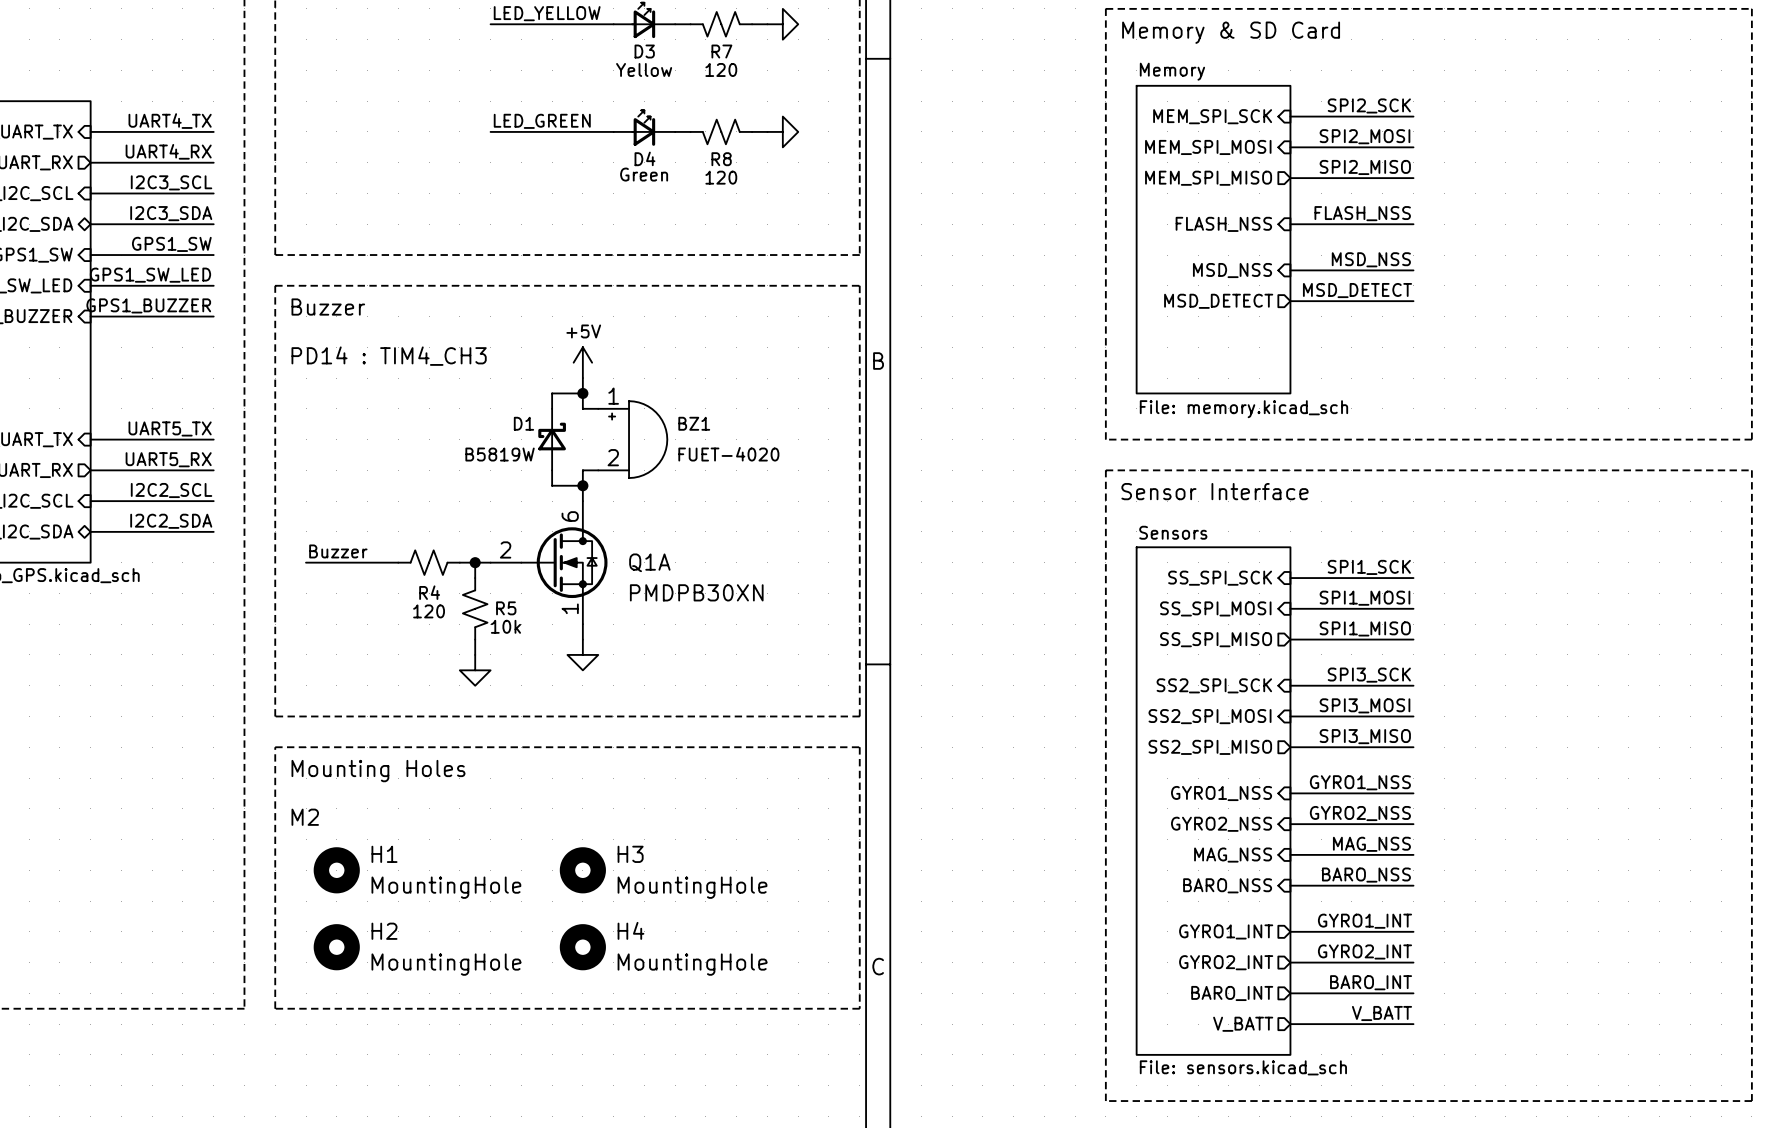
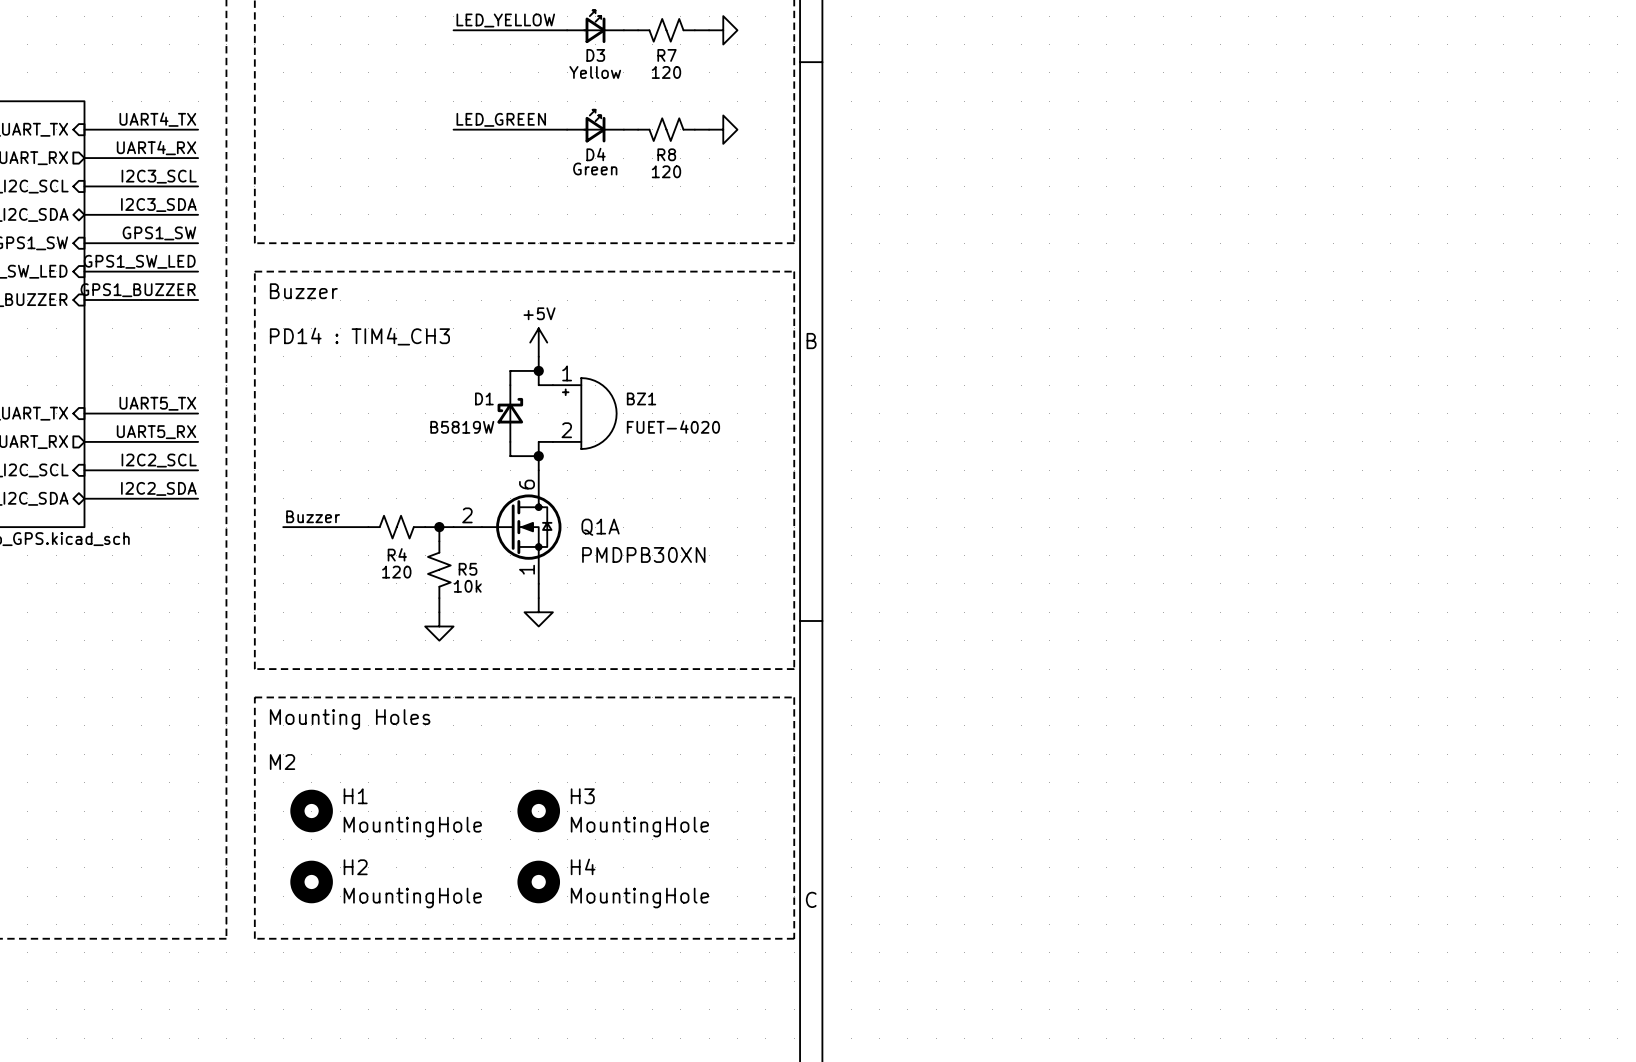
line: (1105, 8) (1105, 439) (1751, 439) (1751, 8) (1105, 8) -> none
text: Memory & SD Card (1231, 32) -> none
label: SPI2_SCK (1369, 105) -> none
sheet pin: MEM_SPI_SCK (1212, 116) -> none
wire: (1290, 116) (1413, 116) -> none
label: SPI2_MOSI (1365, 136) -> none
sheet pin: MEM_SPI_MOSI (1208, 147) -> none
wire: (1290, 147) (1413, 147) -> none
label: SPI2_MISO (1365, 167) -> none
sheet pin: MEM_SPI_MISO (1208, 178) -> none
wire: (1290, 178) (1413, 178) -> none
label: FLASH_NSS (1362, 213) -> none
sheet pin: FLASH_NSS (1223, 224) -> none
wire: (1290, 224) (1413, 224) -> none
sheet Memory: File: memory.kicad_sch (1213, 239) -> none
label: MSD_NSS (1371, 259) -> none
sheet pin: MSD_NSS (1232, 270) -> none
wire: (1290, 270) (1413, 270) -> none
label: MSD_DETECT (1357, 290) -> none
sheet pin: MSD_DETECT (1218, 301) -> none
wire: (1290, 301) (1413, 301) -> none
line: (1105, 470) (1751, 470) (1751, 1101) (1105, 1101) (1105, 470) -> none
text: Sensor Interface (1214, 491) -> none
label: SPI1_SCK (1369, 567) -> none
sheet pin: SS_SPI_SCK (1220, 578) -> none
wire: (1290, 578) (1413, 578) -> none
label: SPI1_MOSI (1365, 598) -> none
sheet pin: SS_SPI_MOSI (1215, 608) -> none
wire: (1290, 608) (1413, 608) -> none
label: SPI1_MISO (1365, 628) -> none
sheet pin: SS_SPI_MISO (1216, 639) -> none
wire: (1290, 639) (1413, 639) -> none
label: SPI3_SCK (1369, 675) -> none
sheet pin: SS2_SPI_SCK (1214, 685) -> none
wire: (1290, 685) (1413, 685) -> none
label: SPI3_MOSI (1365, 705) -> none
sheet pin: SS2_SPI_MOSI (1210, 716) -> none
wire: (1290, 716) (1413, 716) -> none
label: SPI3_MISO (1365, 736) -> none
sheet pin: SS2_SPI_MISO (1210, 747) -> none
wire: (1290, 747) (1413, 747) -> none
label: GYRO1_NSS (1360, 782) -> none
sheet pin: GYRO1_NSS (1221, 793) -> none
wire: (1290, 793) (1413, 793) -> none
sheet Sensors: File: sensors.kicad_sch (1213, 801) -> none
label: GYRO2_NSS (1360, 813) -> none
sheet pin: GYRO2_NSS (1221, 824) -> none
wire: (1290, 824) (1413, 824) -> none
label: MAG_NSS (1371, 844) -> none
wire: (1290, 854) (1413, 854) -> none
sheet pin: MAG_NSS (1233, 855) -> none
label: BARO_NSS (1366, 875) -> none
sheet pin: BARO_NSS (1227, 885) -> none
wire: (1290, 885) (1413, 885) -> none
label: GYRO1_INT (1365, 921) -> none
sheet pin: GYRO1_INT (1226, 931) -> none
wire: (1290, 931) (1413, 931) -> none
label: GYRO2_INT (1365, 951) -> none
sheet pin: GYRO2_INT (1226, 962) -> none
wire: (1290, 962) (1413, 962) -> none
label: BARO_INT (1371, 982) -> none
sheet pin: BARO_INT (1232, 993) -> none
wire: (1290, 993) (1413, 993) -> none
label: V_BATT (1382, 1013) -> none
sheet pin: V_BATT (1243, 1024) -> none
wire: (1290, 1024) (1413, 1024) -> none

